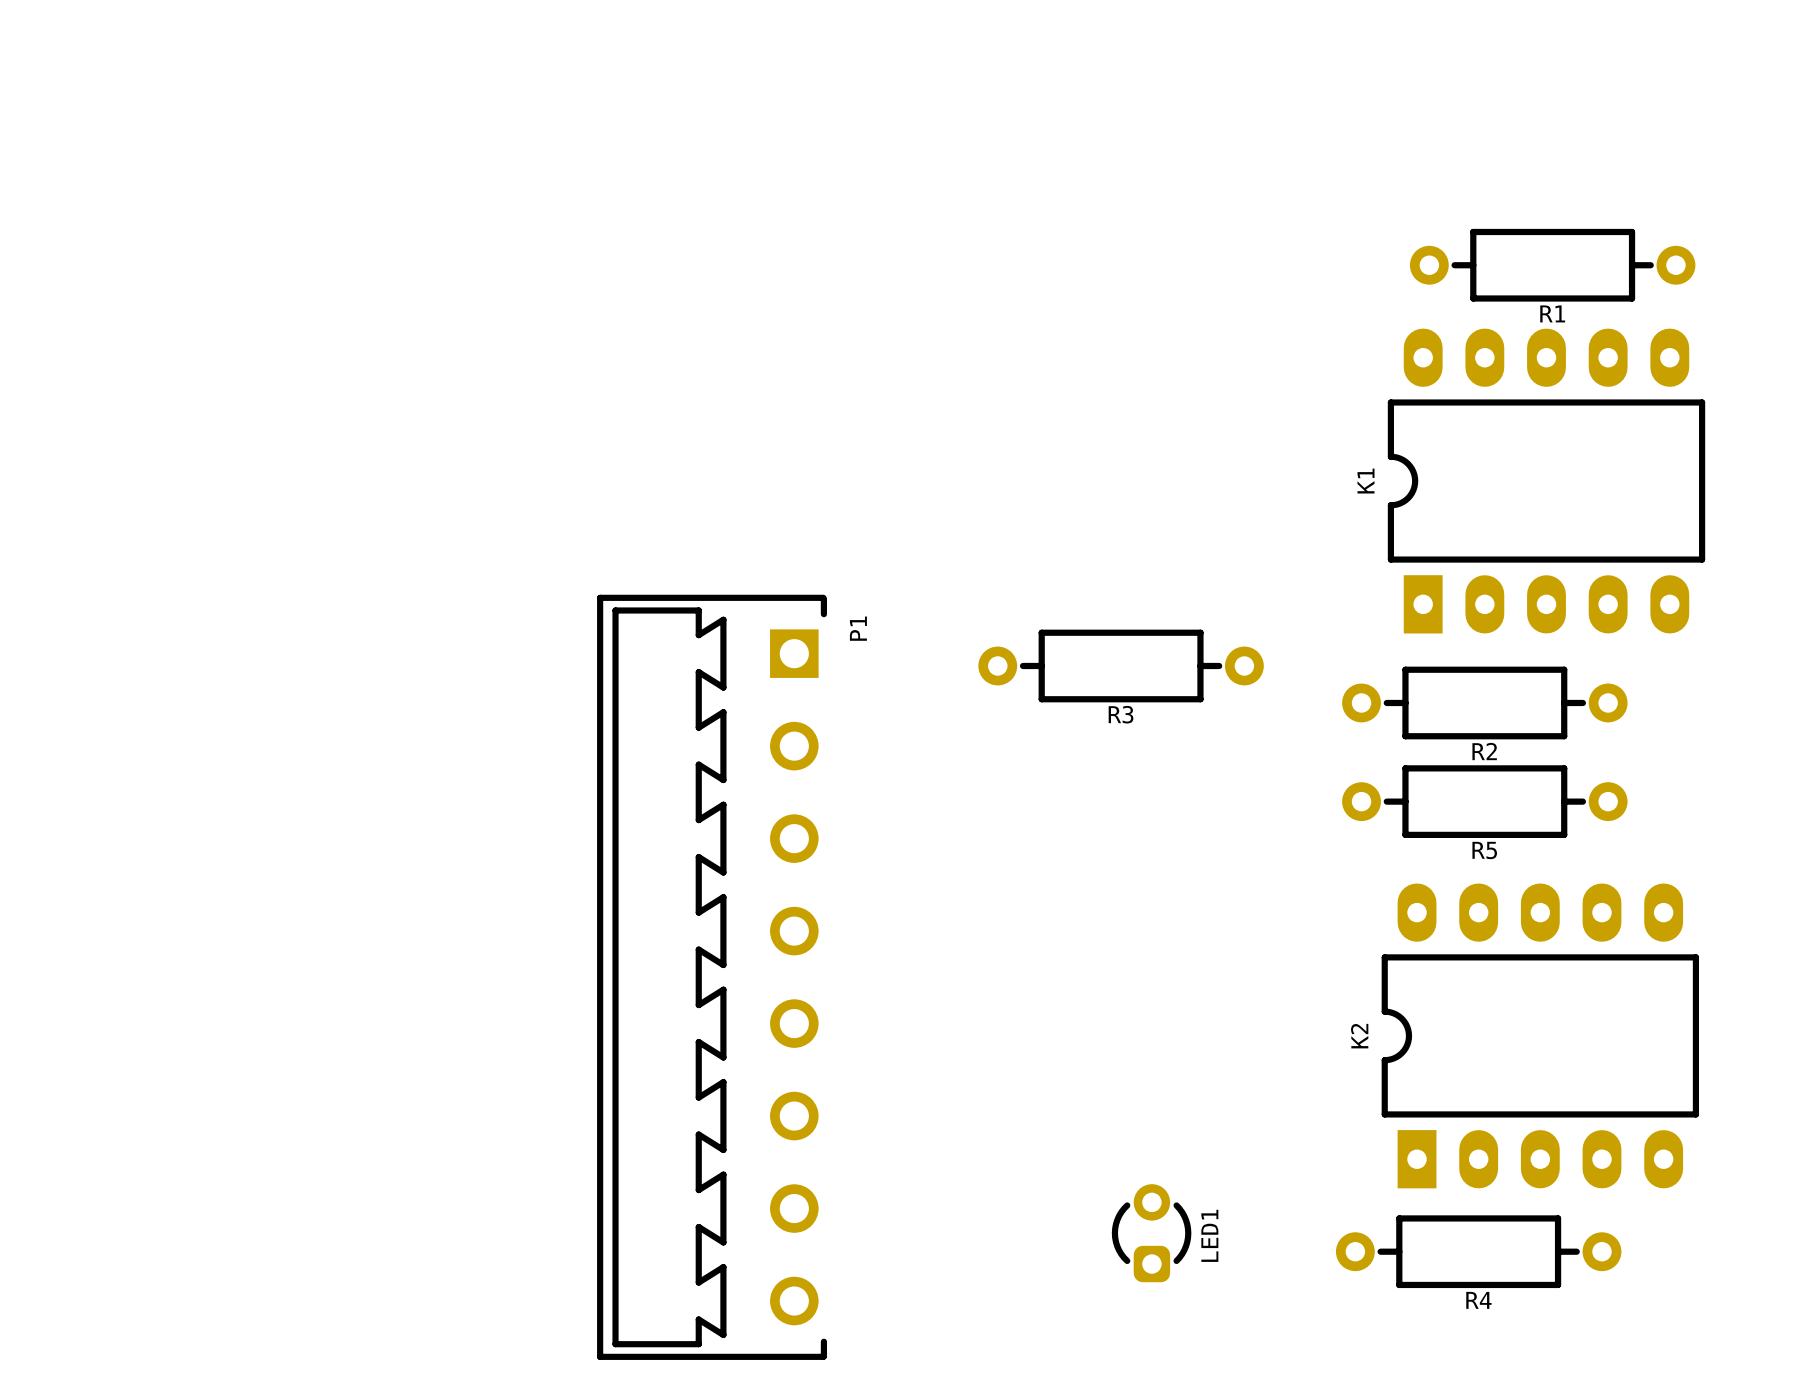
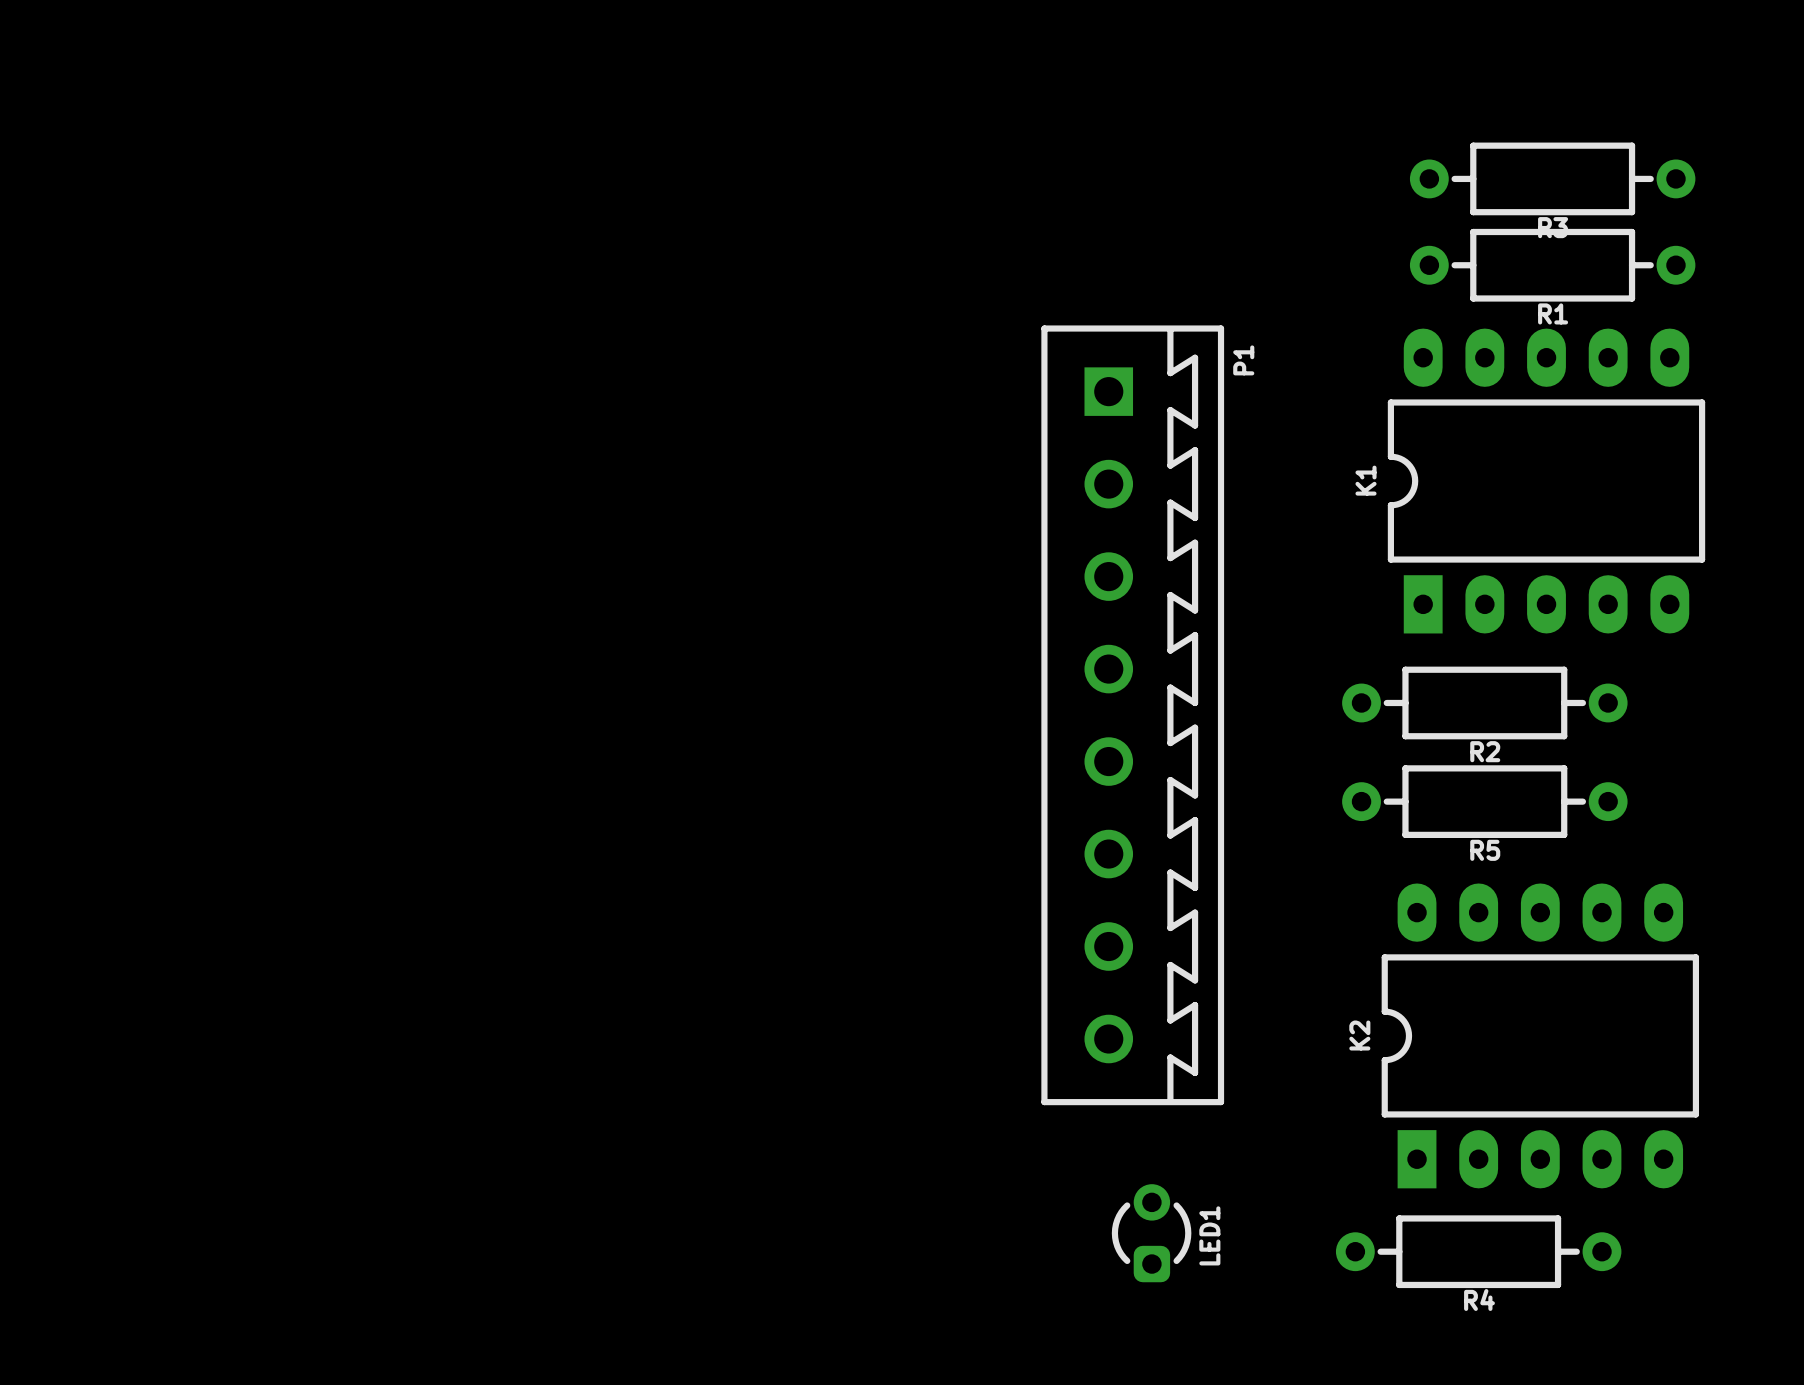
P1 footprint: [597, 594, 827, 1360] -> [1041, 325, 1225, 1106]
R3 position: (1121, 665) -> (1552, 178)

